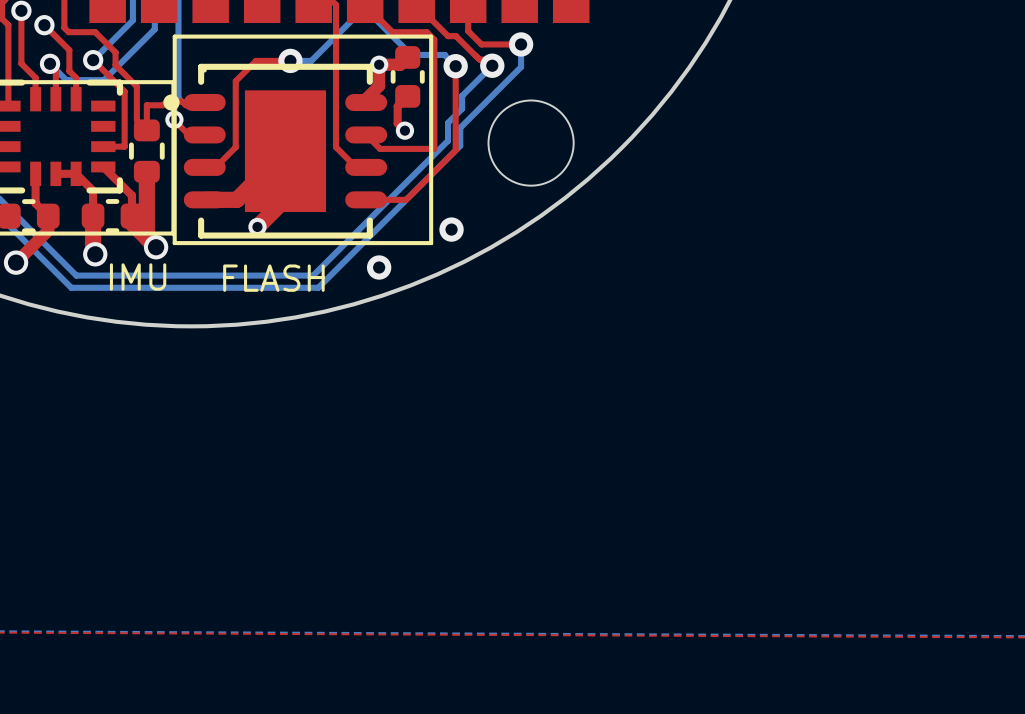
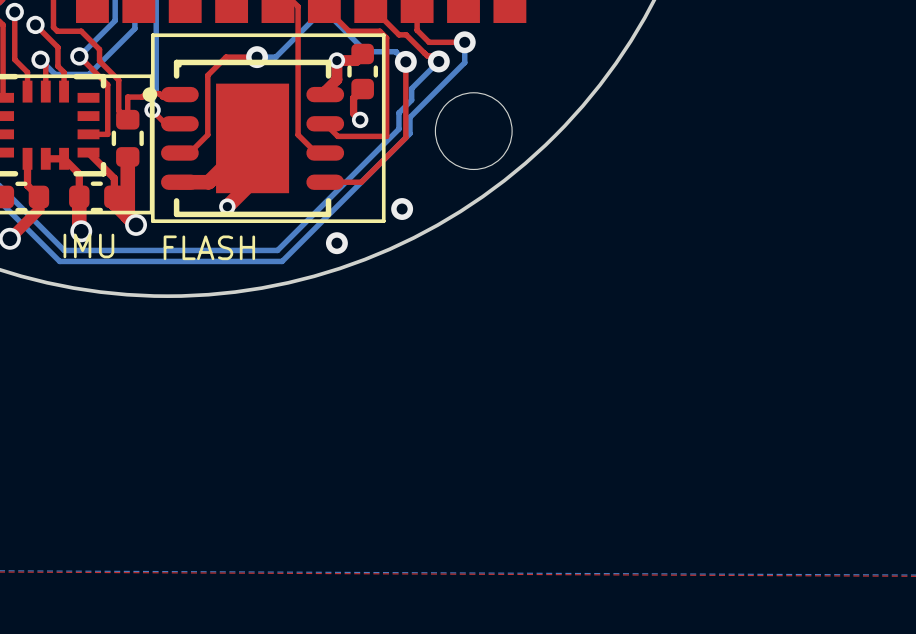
text position: IMU (138, 276) -> IMU (88, 245)
text position: FLASH (273, 278) -> FLASH (209, 247)

